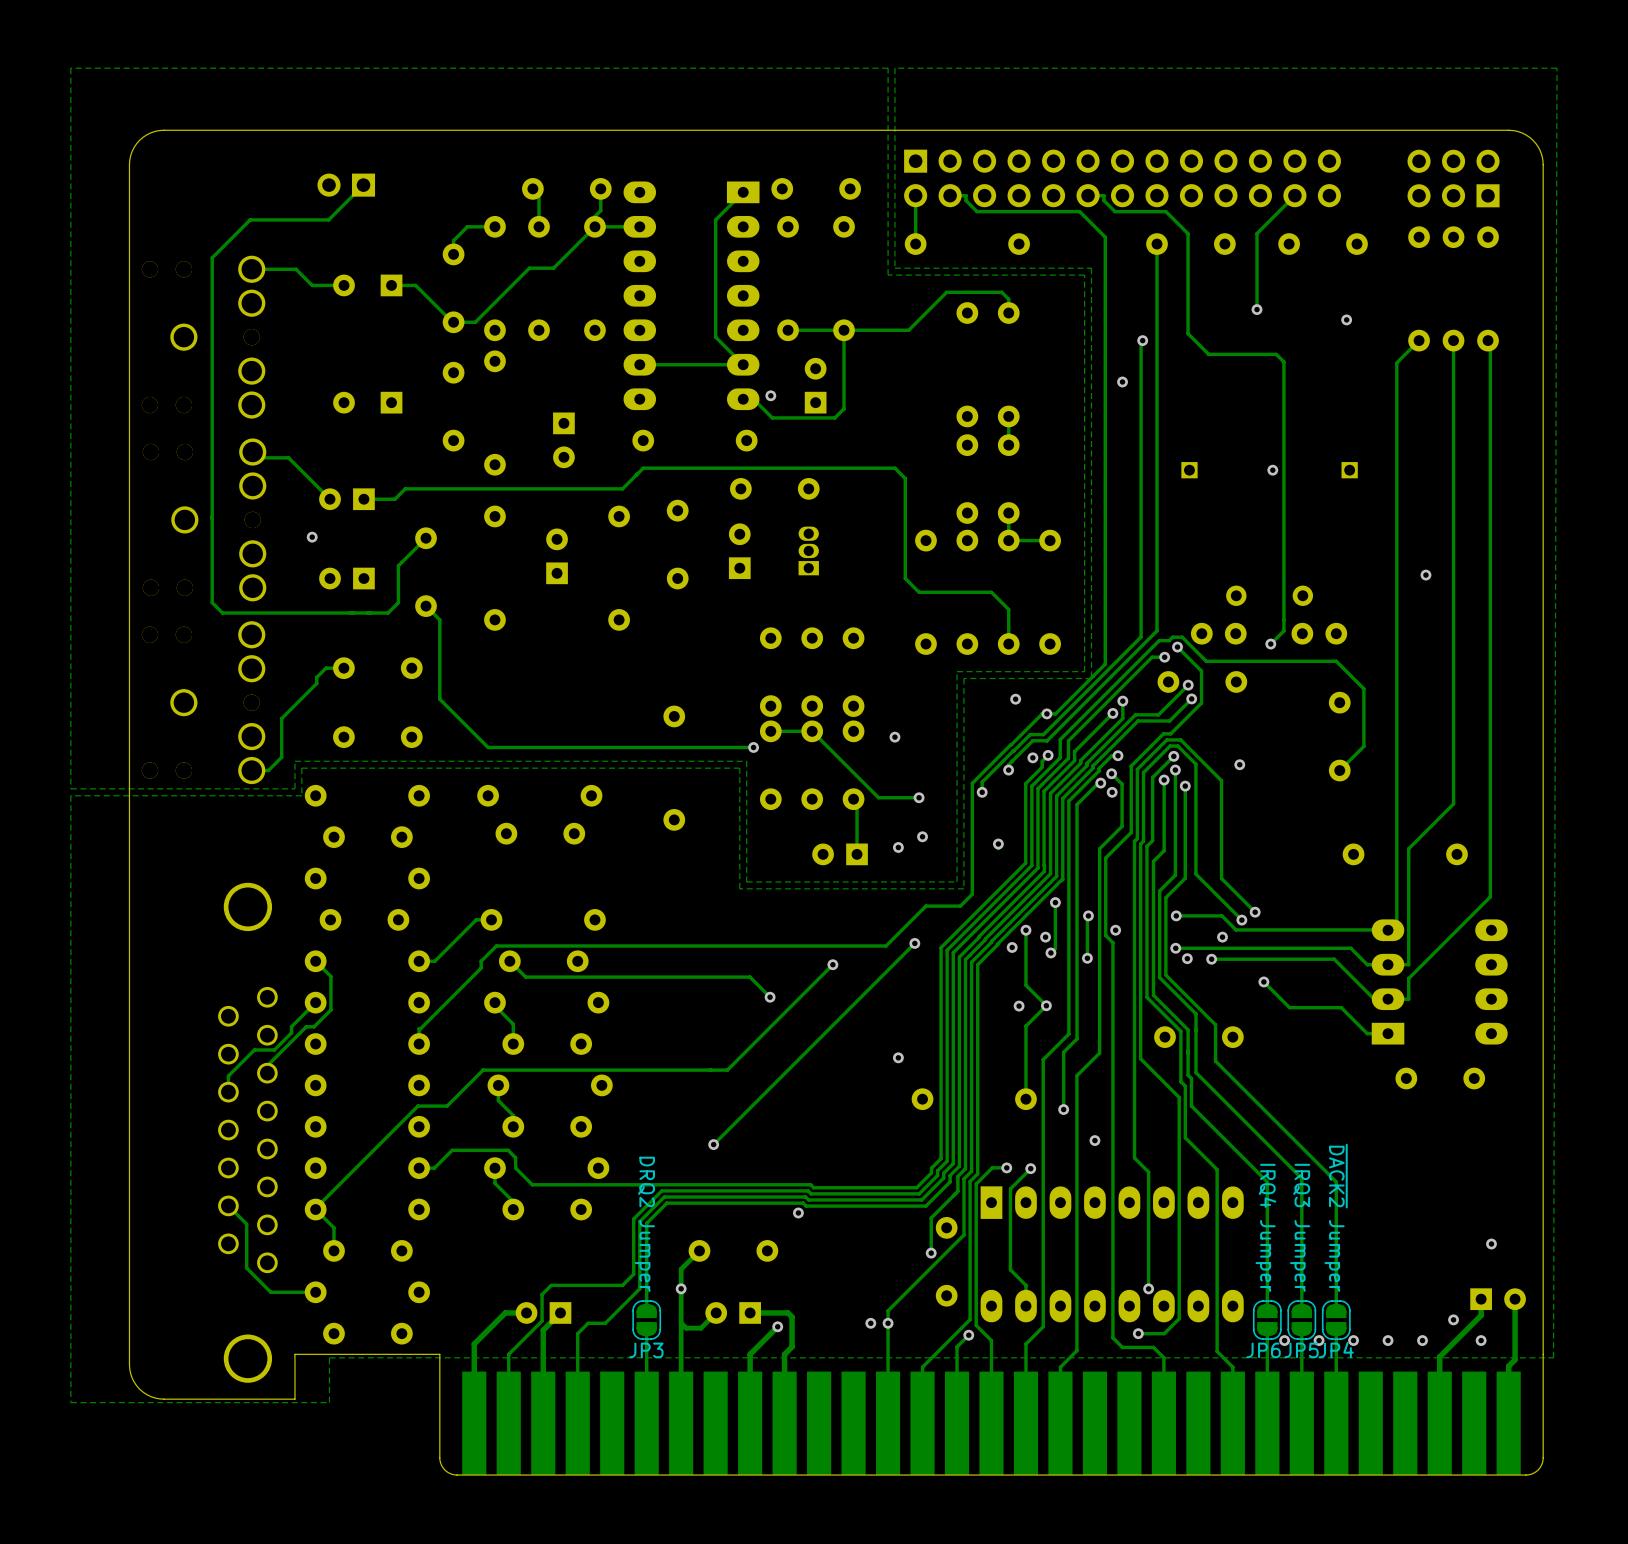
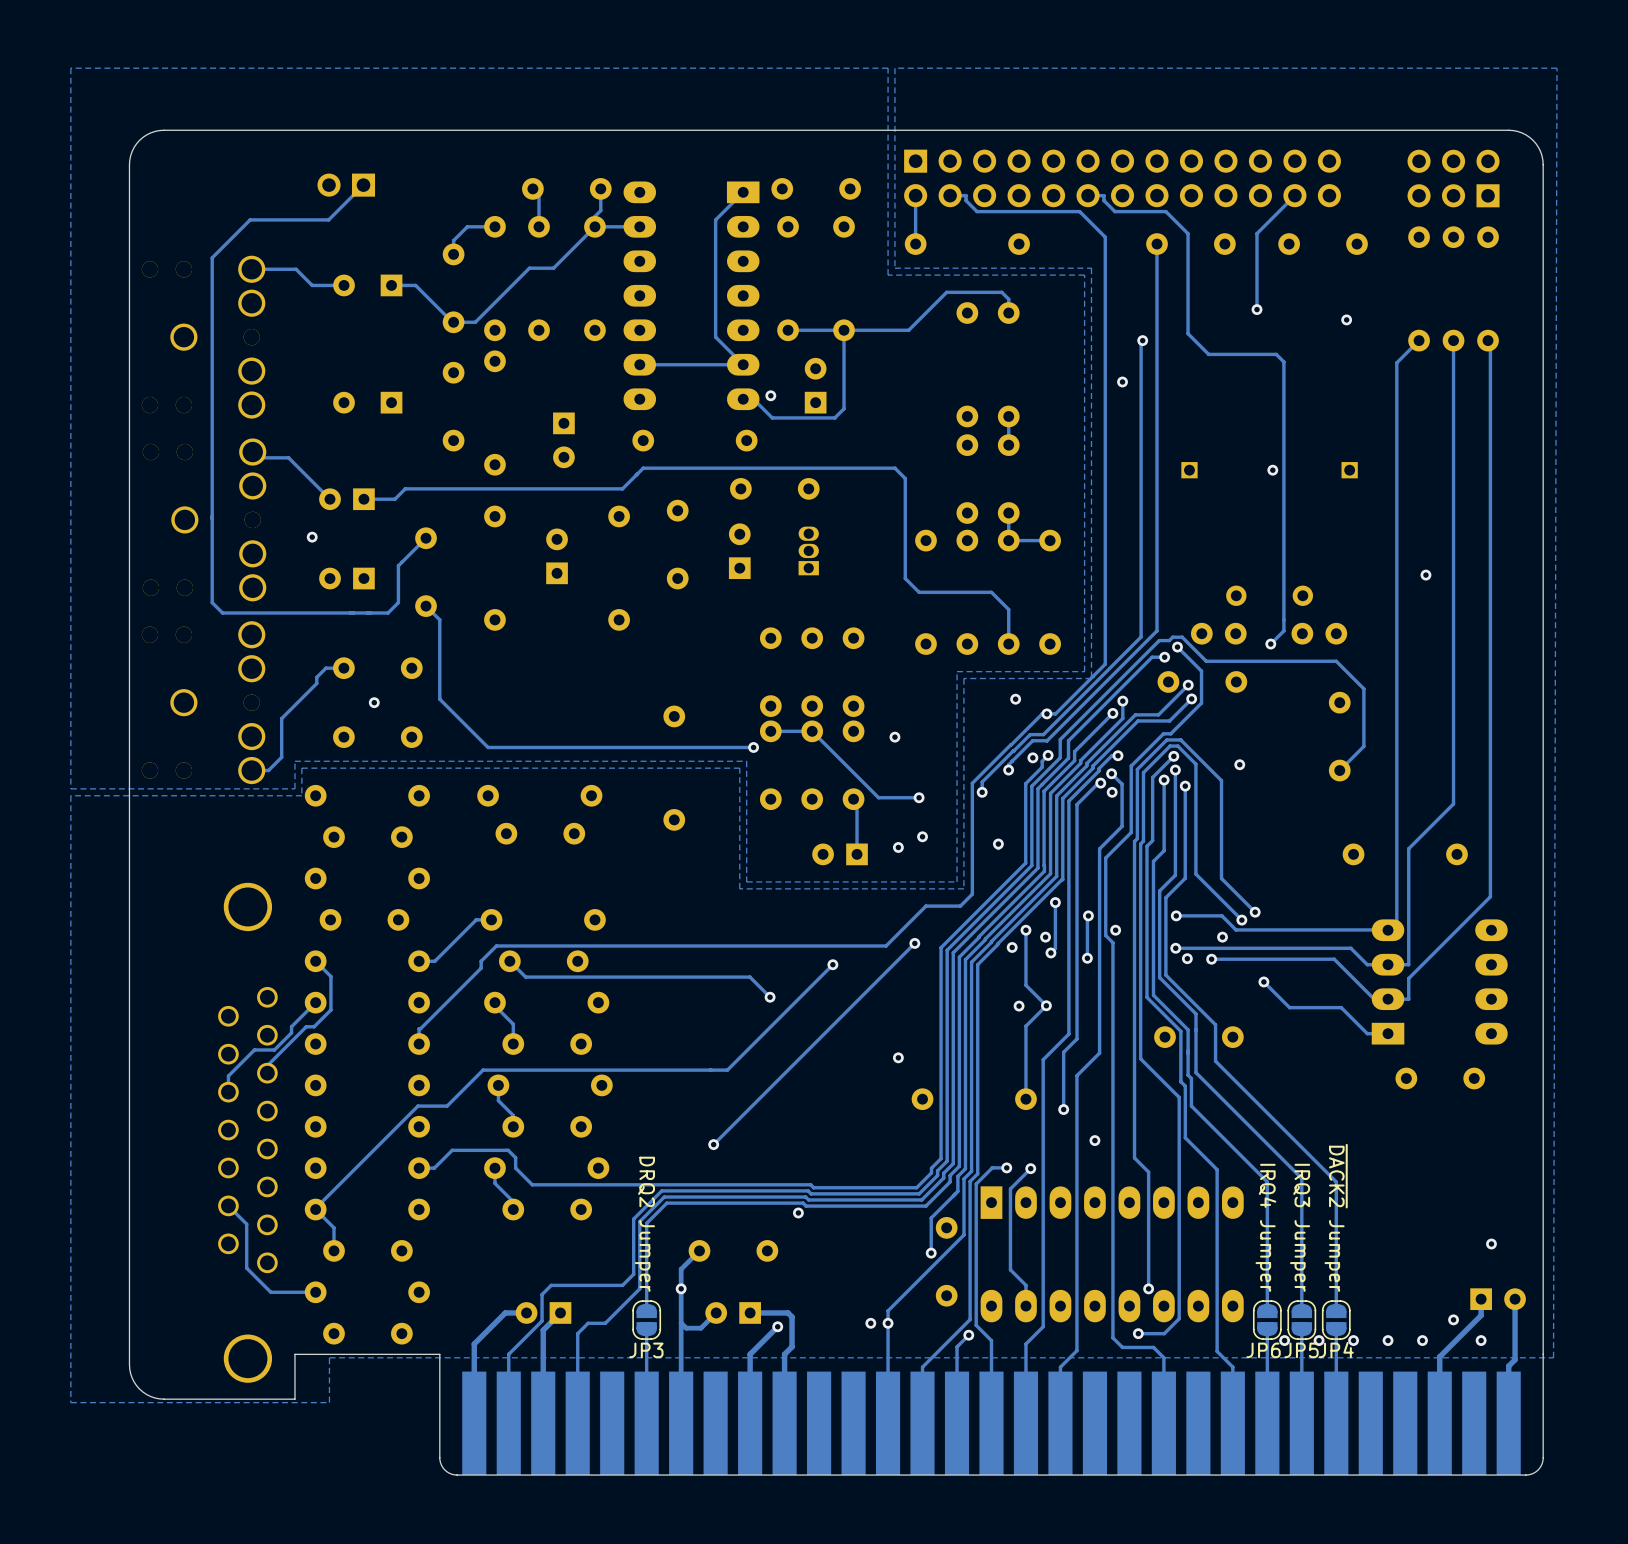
via: none -> (374, 702)

